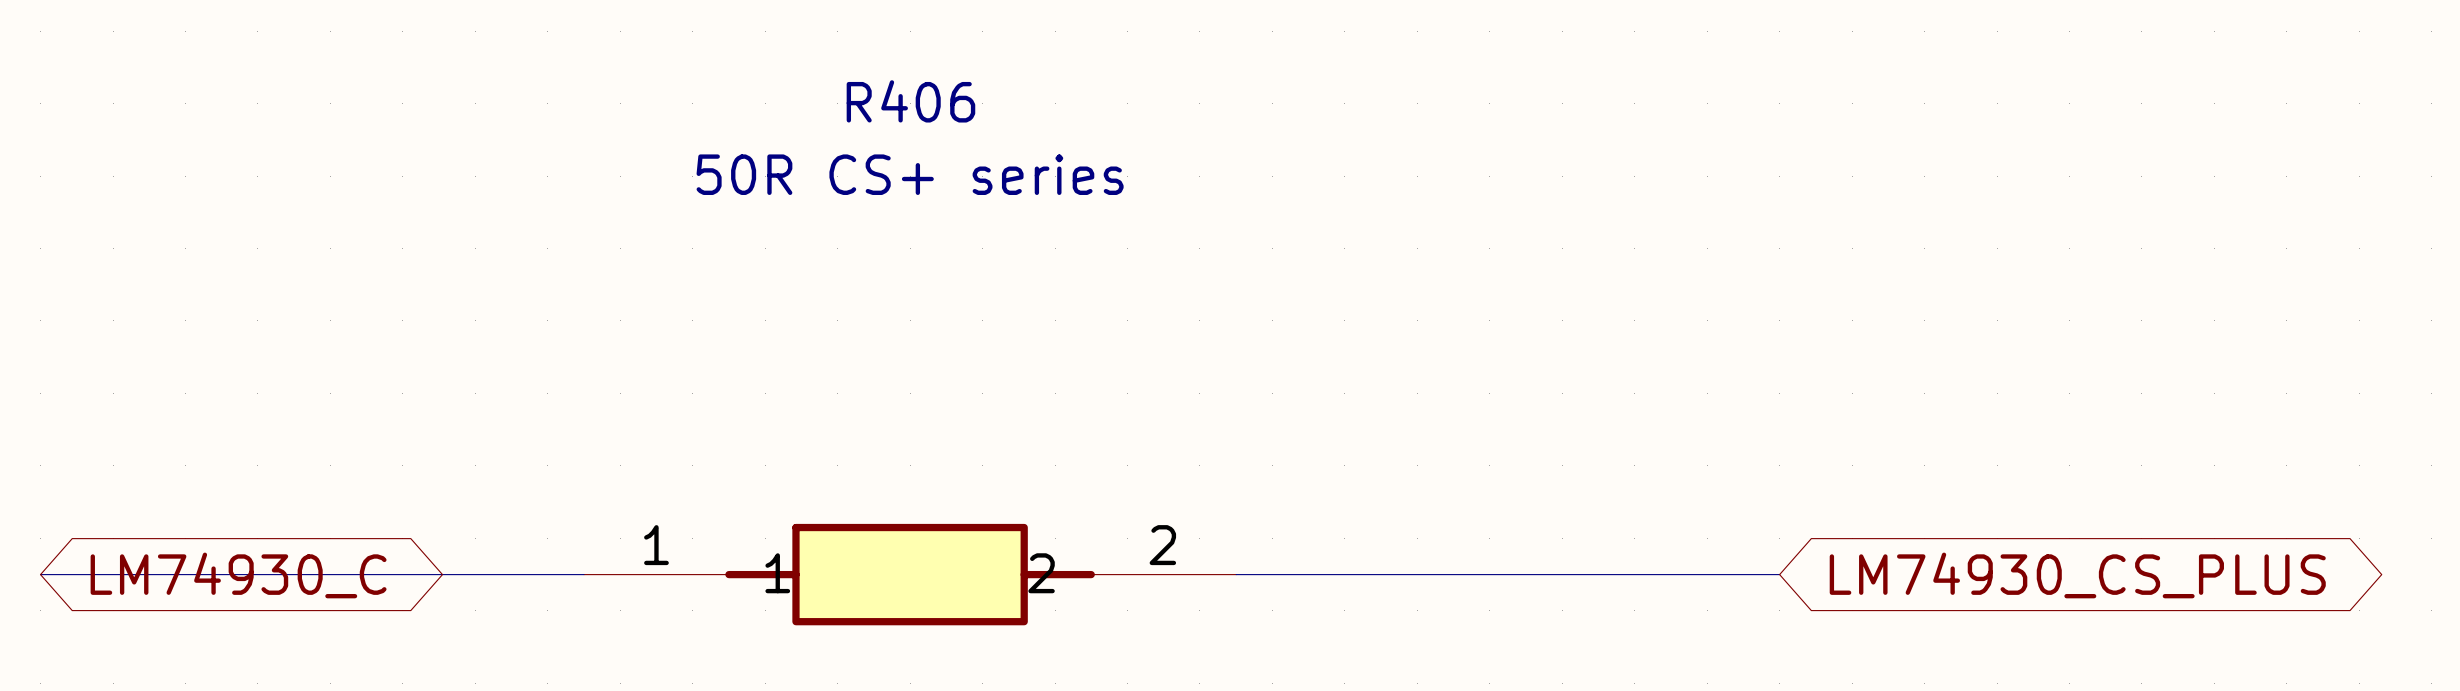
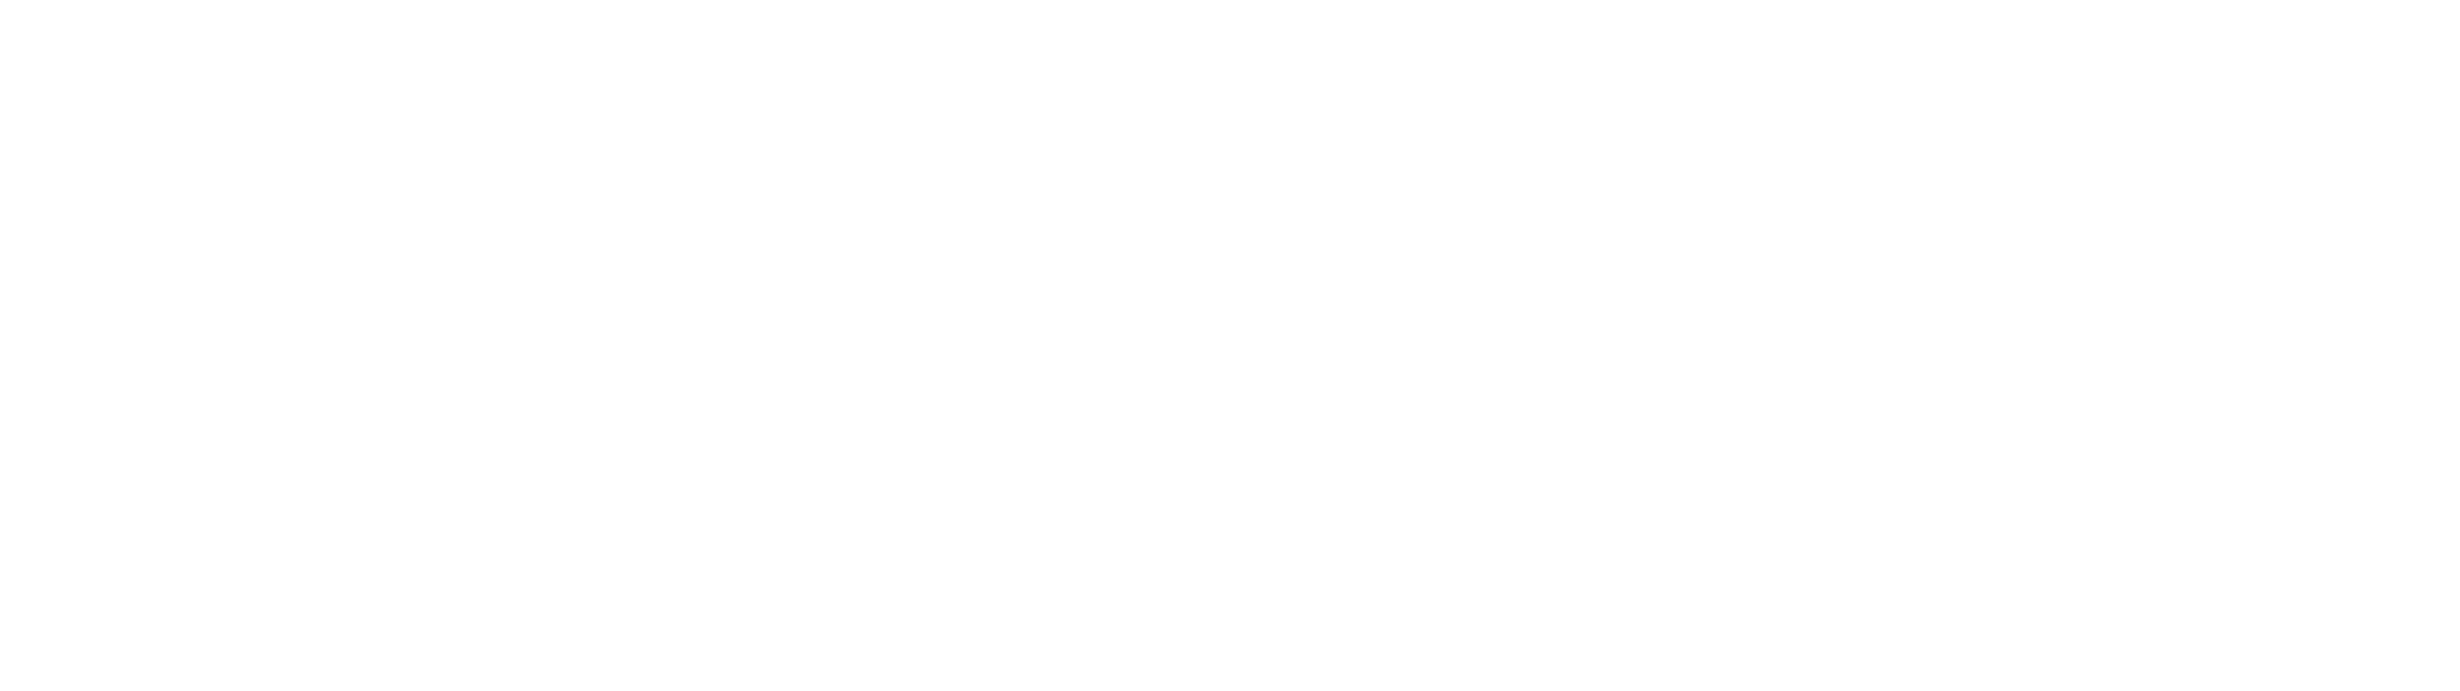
wire: (40, 574) (584, 574) -> none
R406: 50R CS+ series (910, 574) -> none
wire: (1236, 574) (1779, 574) -> none
global label: LM74930_C (238, 575) -> none
global label: LM74930_CS_PLUS (2077, 575) -> none

